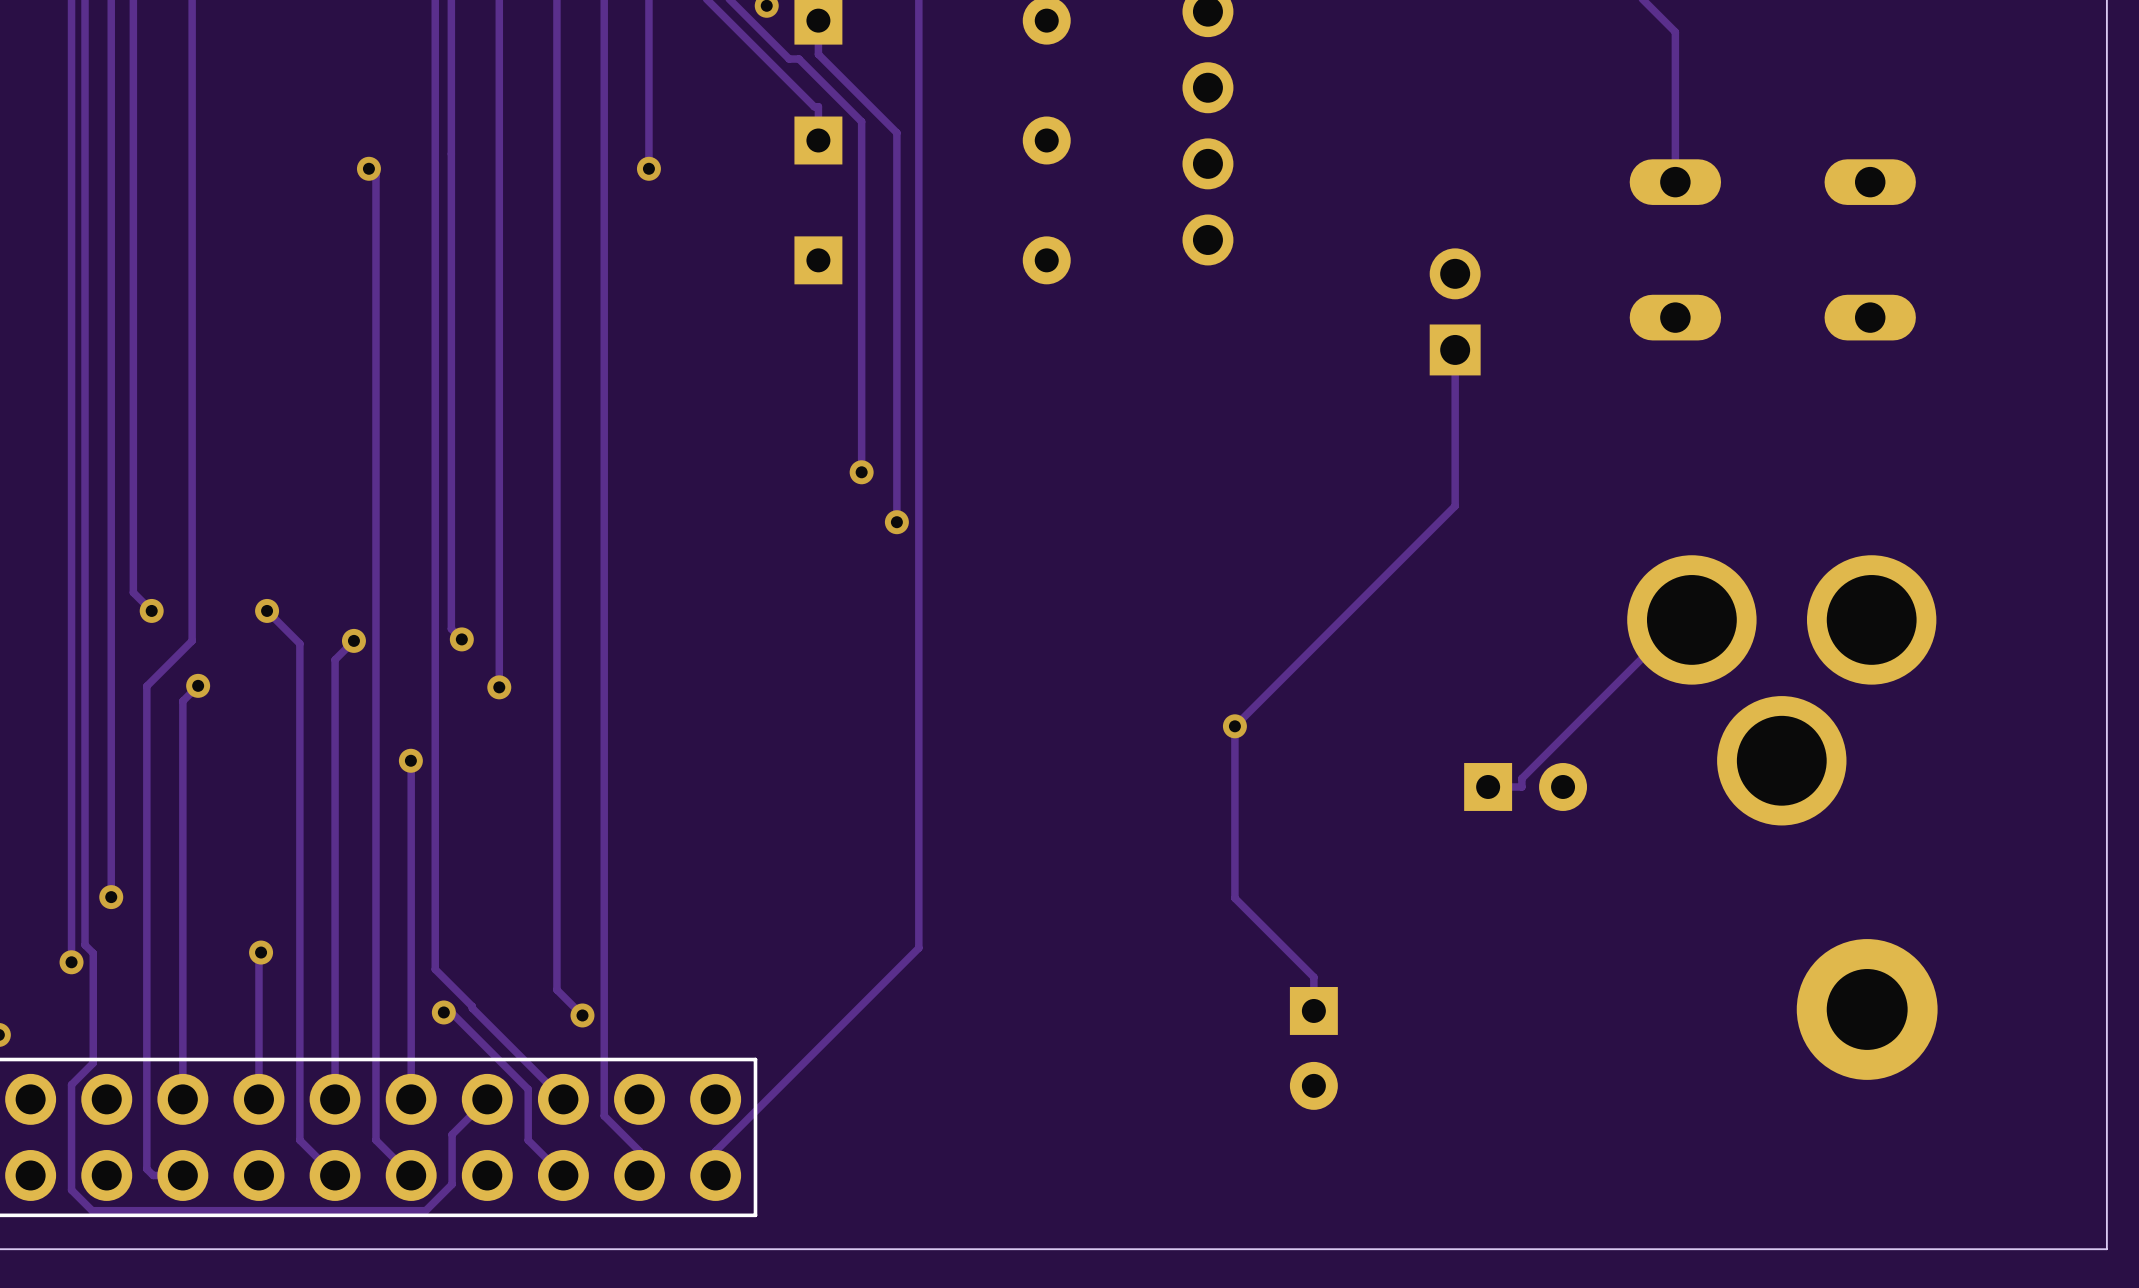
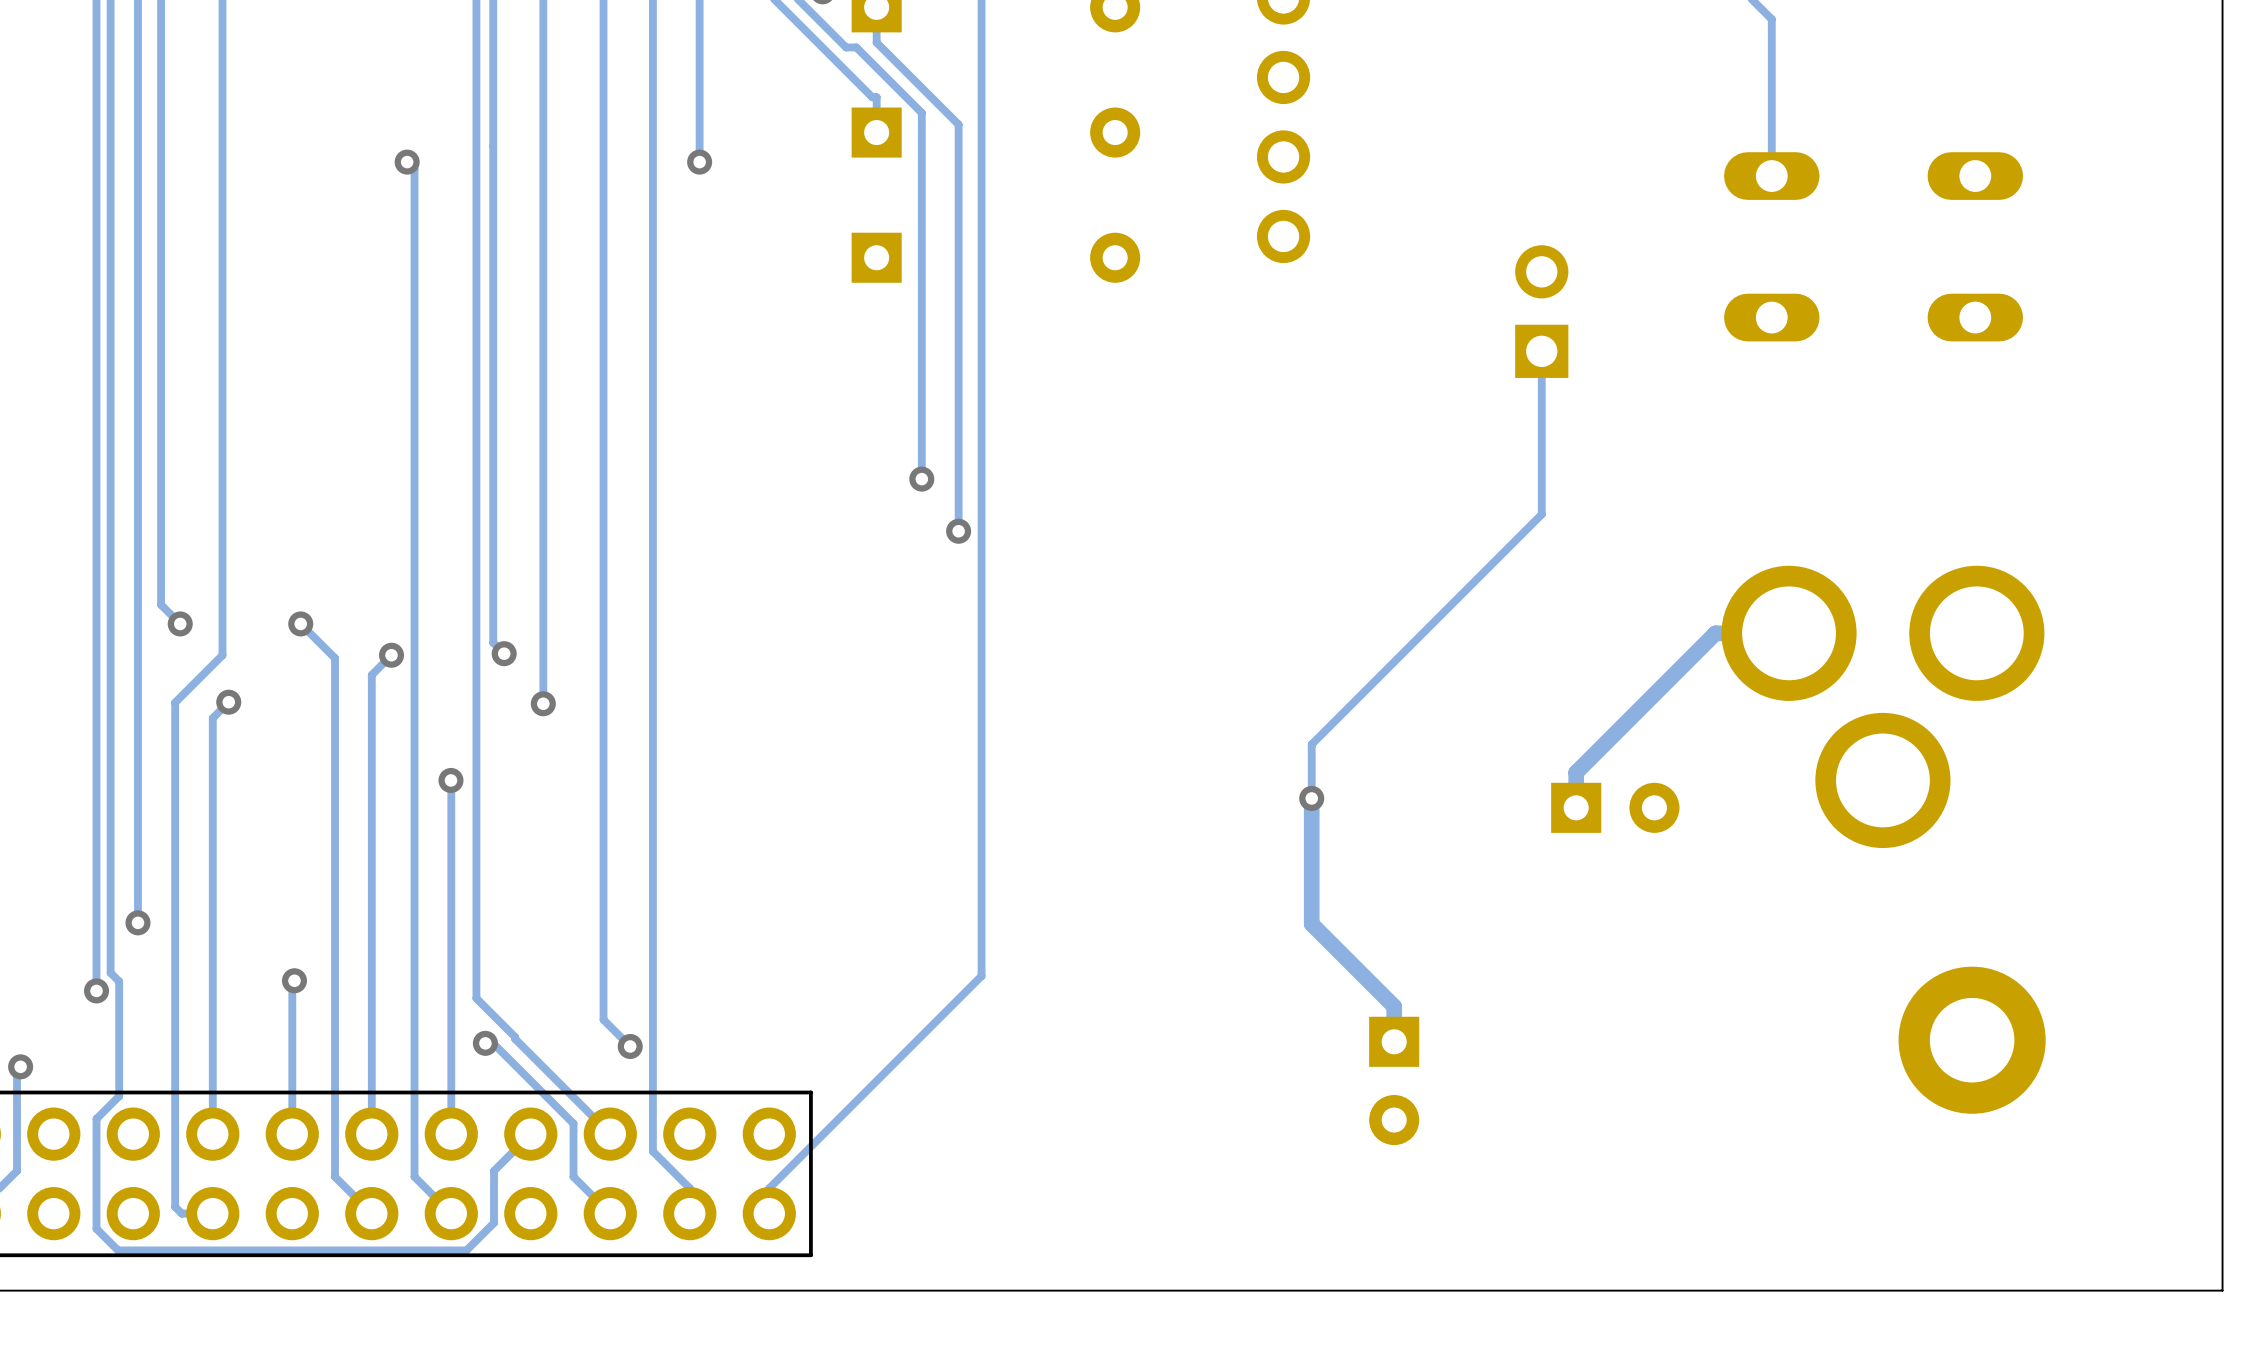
track: (1680, 619) (1521, 778) (1521, 786) (1488, 786) -> (1777, 633) (1715, 633) (1576, 772) (1576, 807)
via position: (1234, 726) -> (1311, 798)
track width: thin (1234, 777) (1234, 898) (1313, 977) (1313, 1010) -> thick (1311, 798) (1311, 924) (1394, 1006) (1394, 1041)

